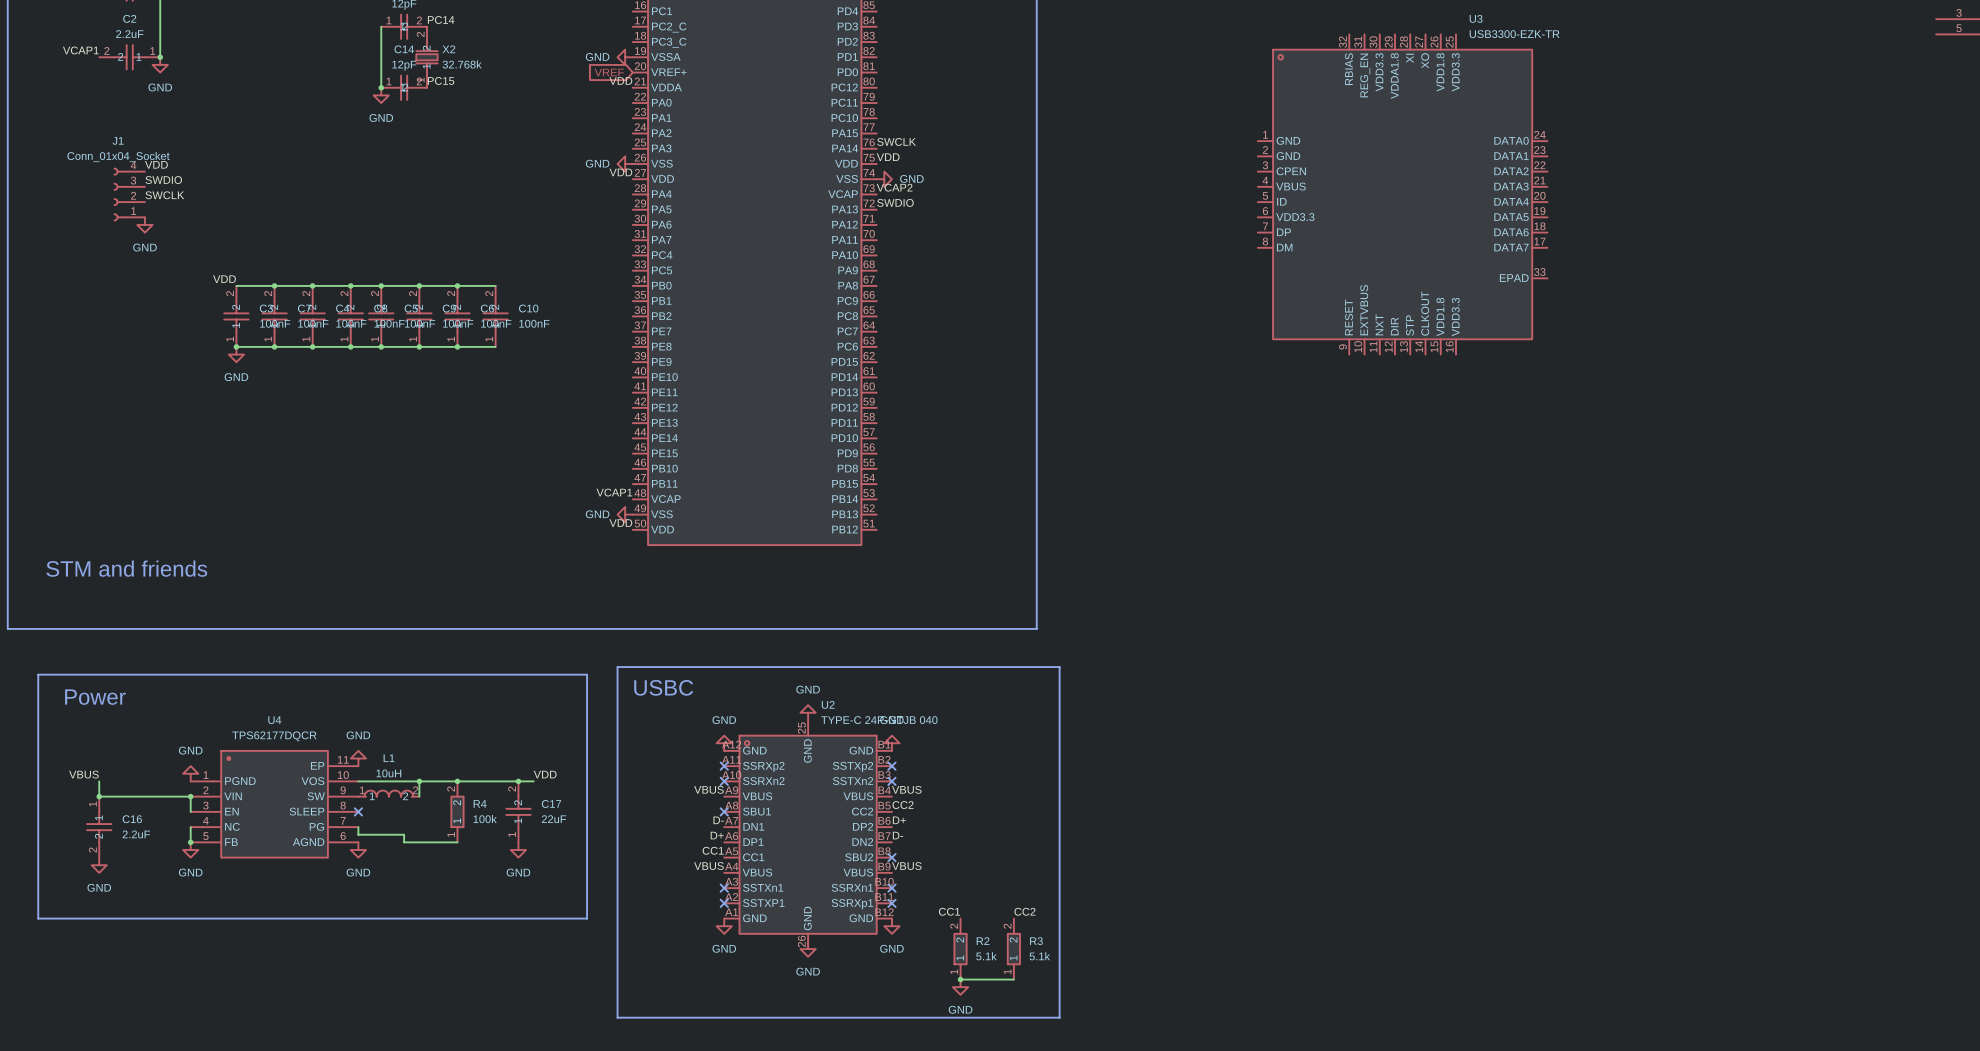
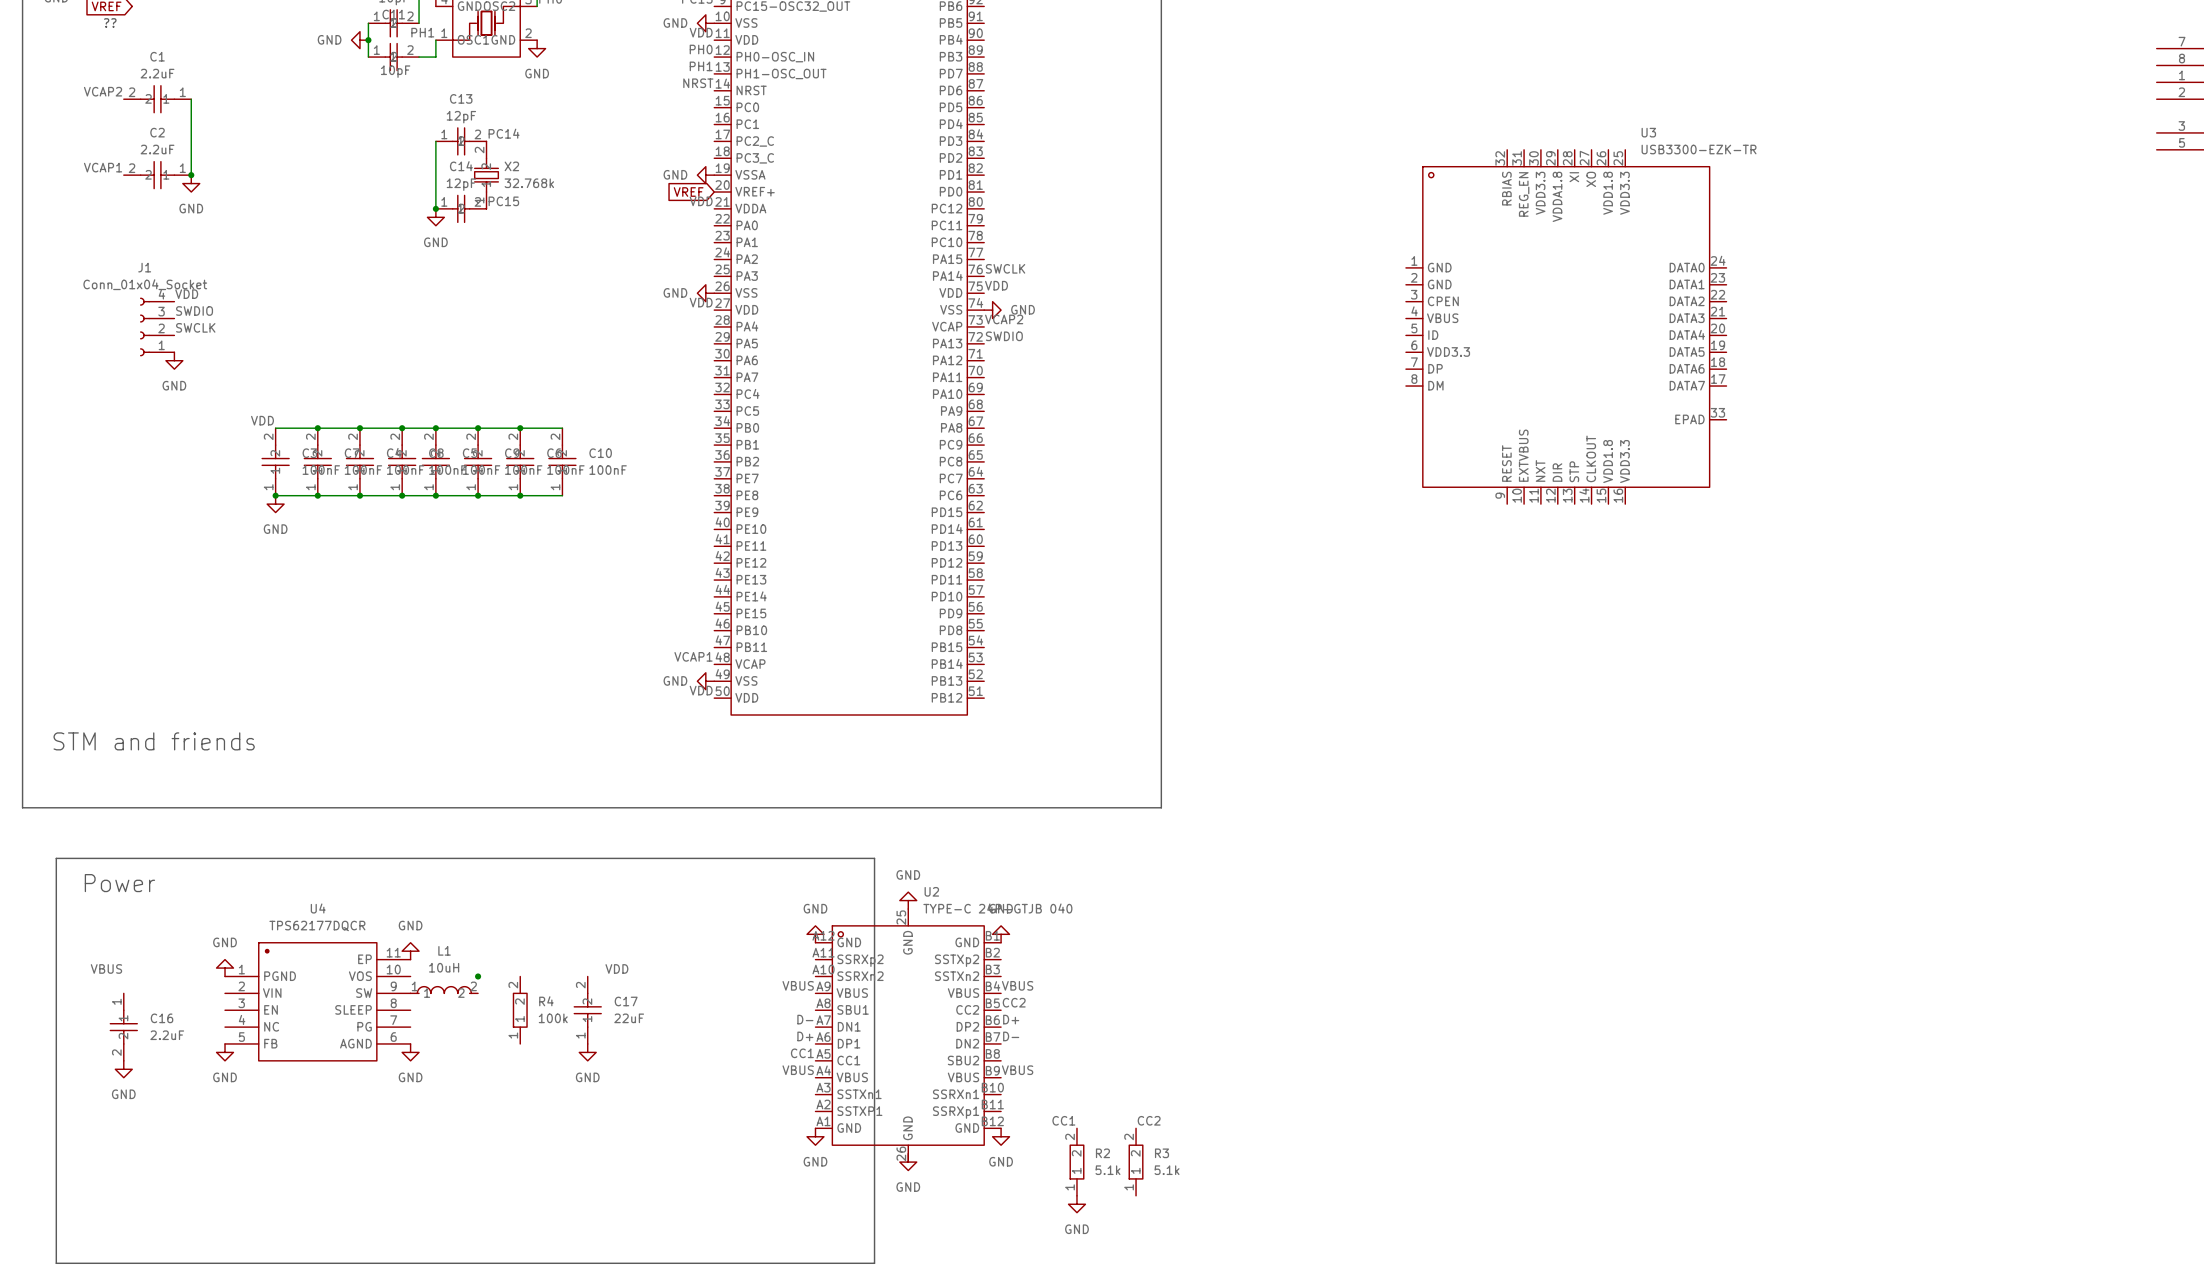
line: (617, 667) (1059, 667) (1059, 1017) (617, 1017) (617, 667) -> none
line: (587, 674) (587, 918) (38, 918) -> (663, 858) (874, 858) (874, 1263) (56, 1263) (56, 1128)
text: USBC (663, 687) -> none
no-connect mark: (724, 766) -> none
no-connect mark: (891, 766) -> none
wire: (99, 781) (99, 796) (190, 796) (190, 811) -> none
wire: (358, 781) (533, 781) -> none
wire: (419, 781) (419, 796) -> none
junction: (457, 781) -> none
junction: (518, 781) -> none
no-connect mark: (724, 781) -> none
no-connect mark: (891, 781) -> none
junction: (99, 796) -> none
junction: (190, 796) -> none
no-connect mark: (358, 811) -> none
no-connect mark: (724, 811) -> none
wire: (190, 827) (190, 842) -> none
wire: (358, 827) (358, 834) (404, 834) (404, 842) (457, 842) -> none
junction: (190, 842) -> none
no-connect mark: (891, 857) -> none
no-connect mark: (724, 888) -> none
no-connect mark: (891, 888) -> none
no-connect mark: (724, 903) -> none
no-connect mark: (891, 903) -> none
wire: (960, 979) (1013, 979) -> none
junction: (960, 979) -> none

